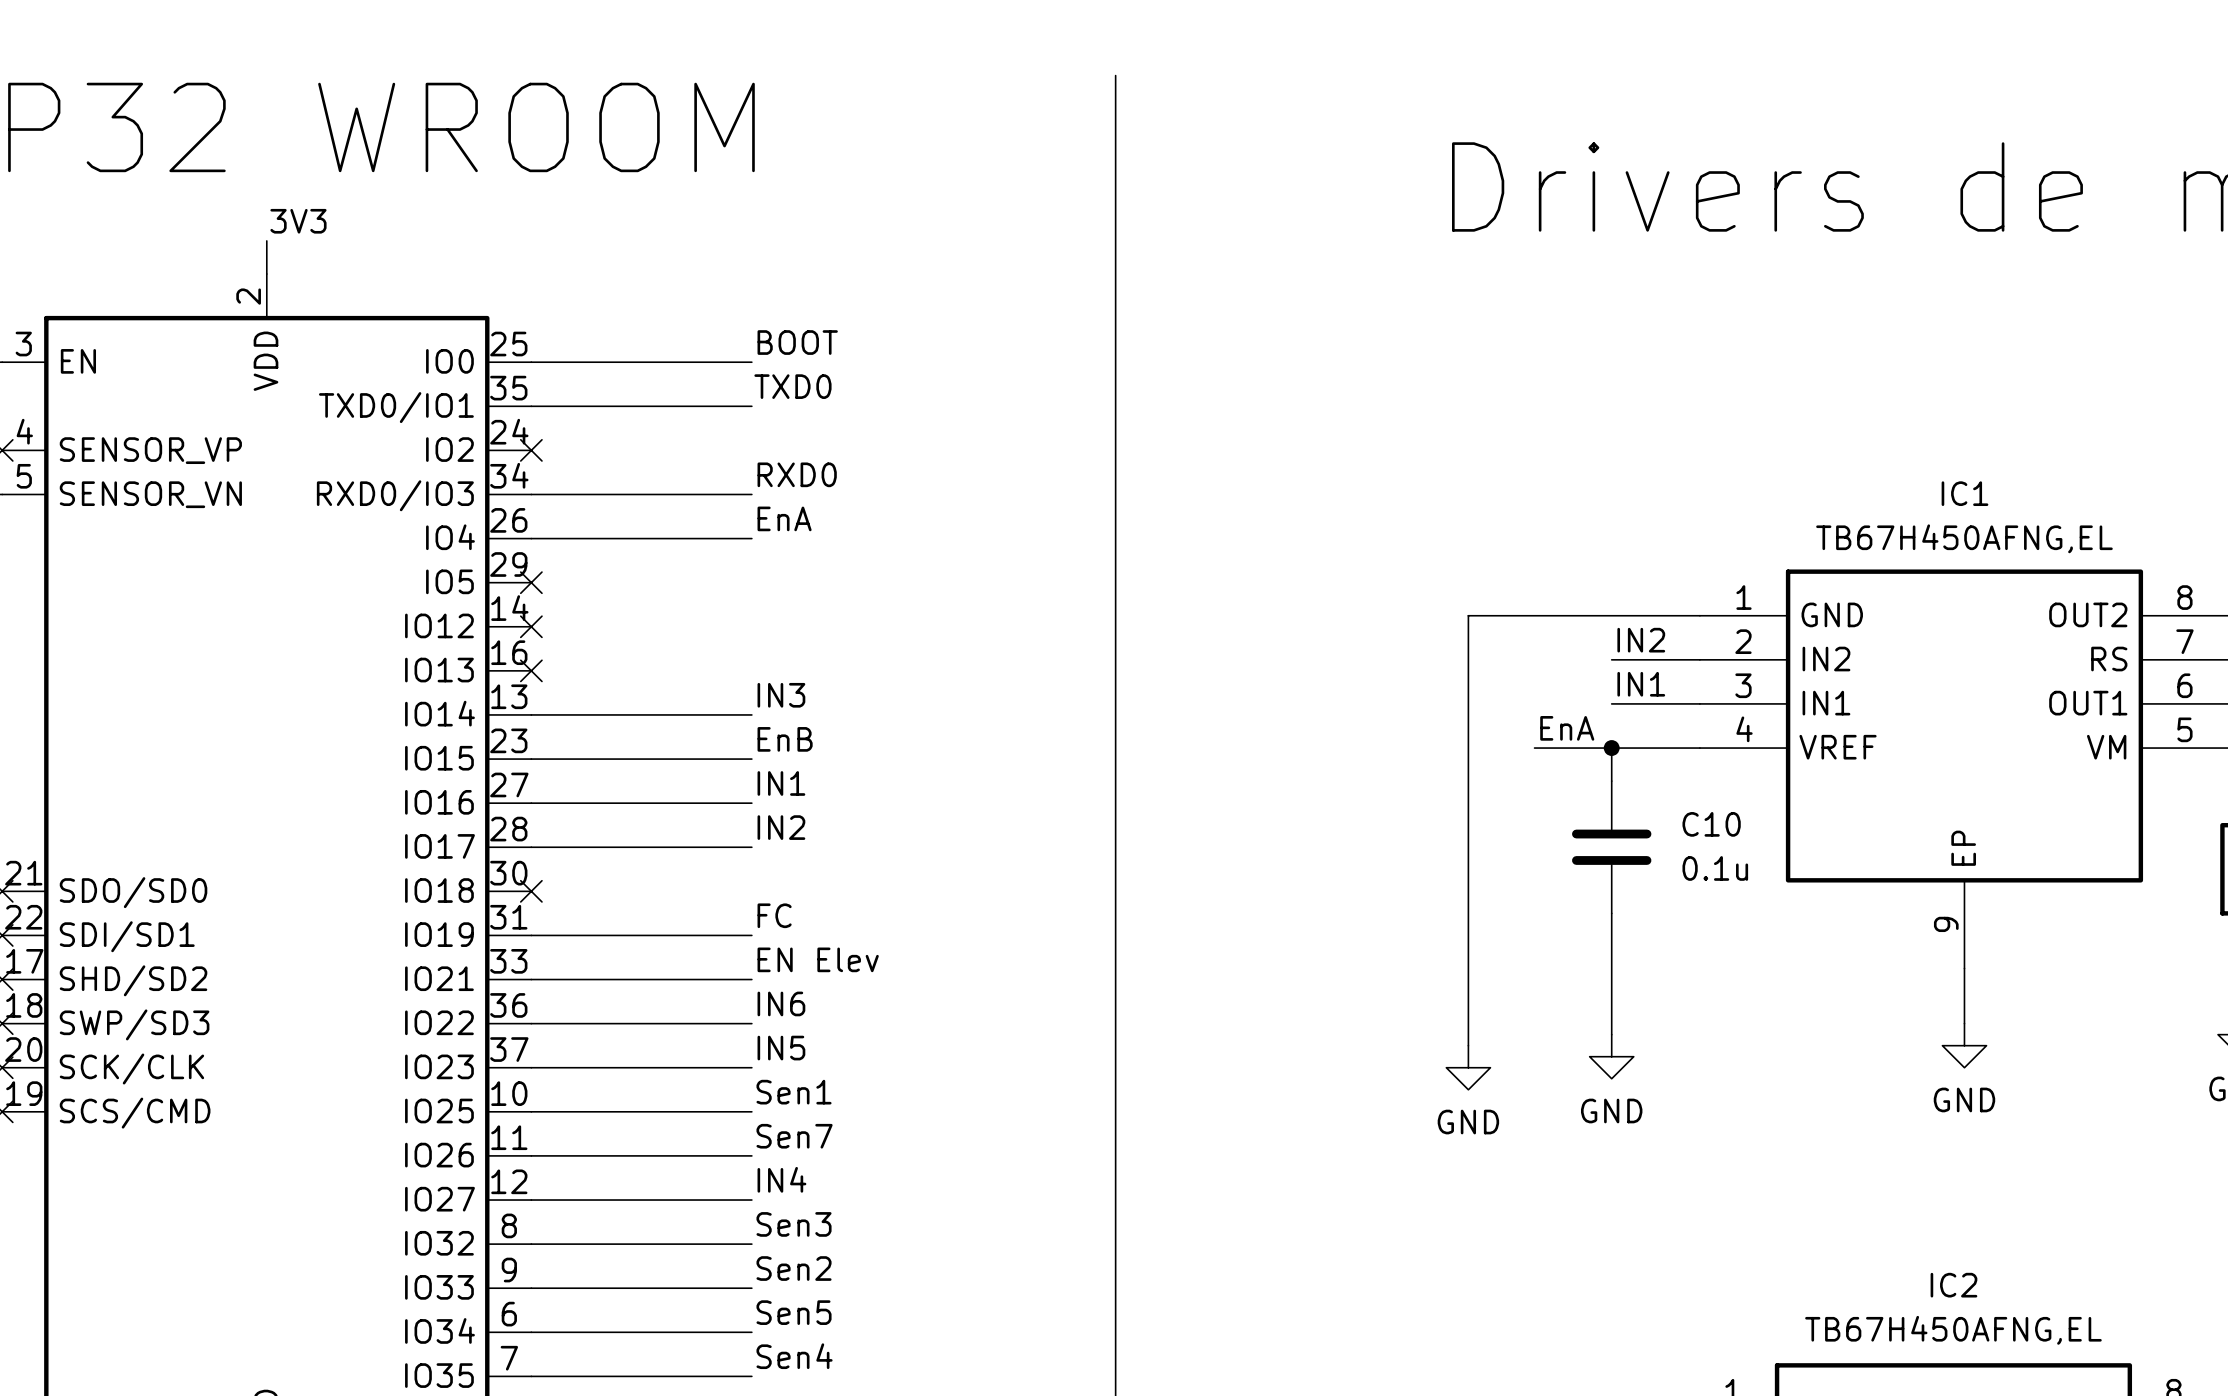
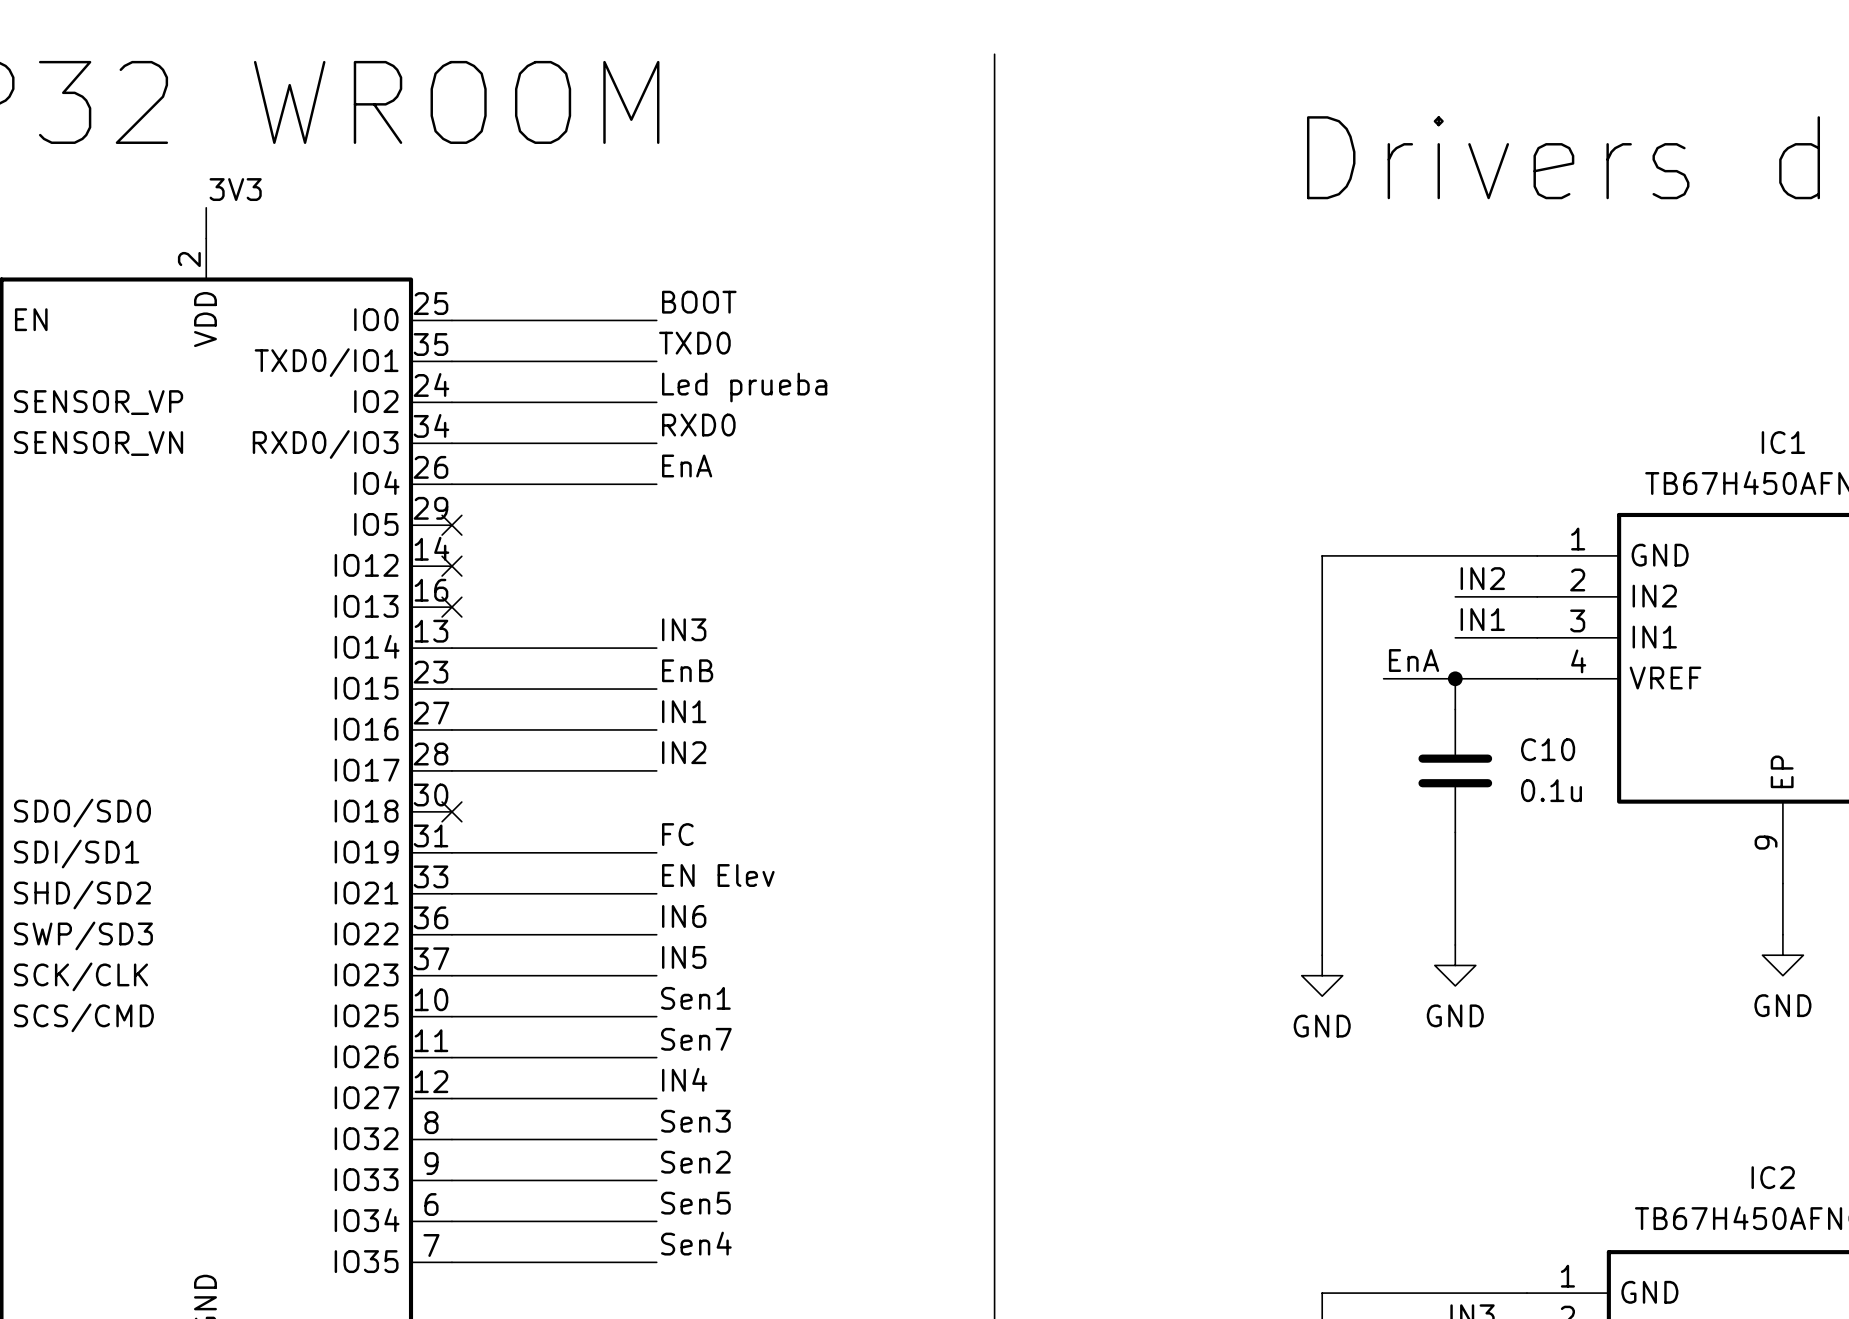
label: none -> Led prueba (744, 387)
wire: none -> (451, 402) (656, 402)
no-connect mark: (531, 450) -> none

